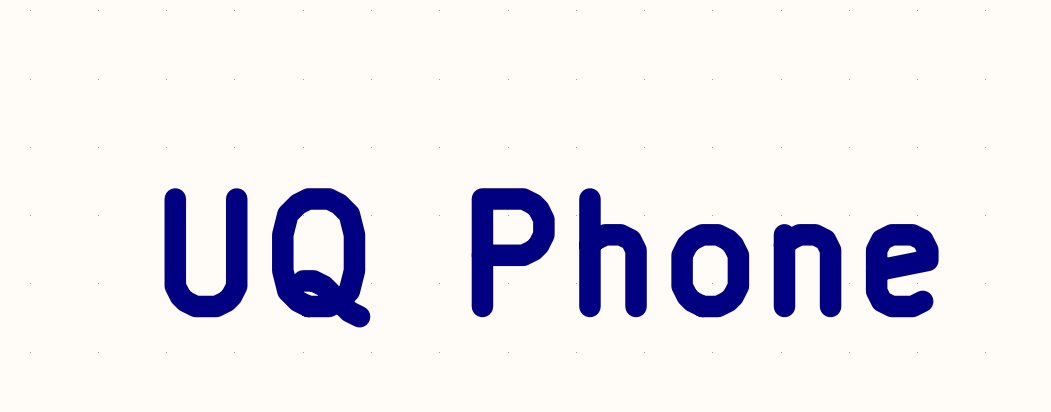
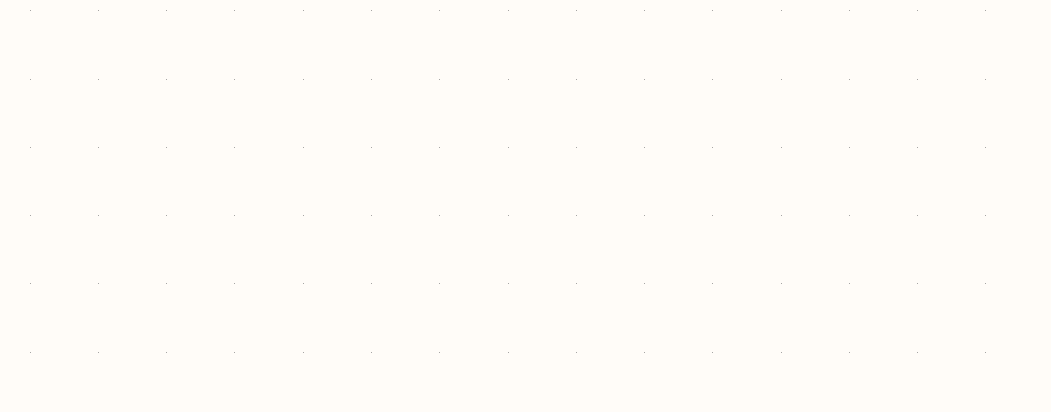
text: UQ Phone (551, 257) -> none

